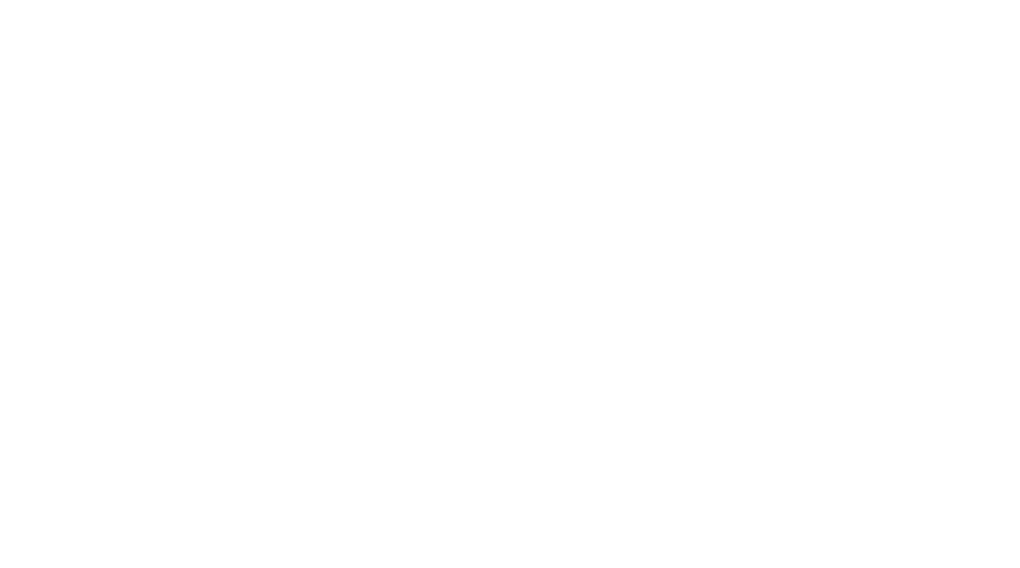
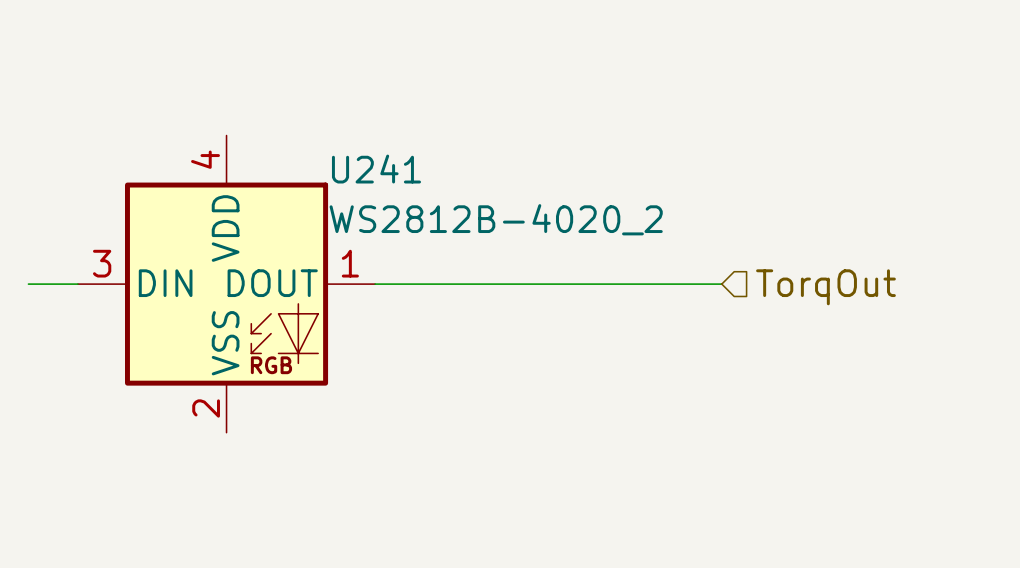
wire: none -> (28, 284) (77, 284)
U241: none -> WS2812B-4020_2 (226, 284)
wire: none -> (375, 284) (721, 284)
hierarchical label: none -> TorqOut (825, 287)

